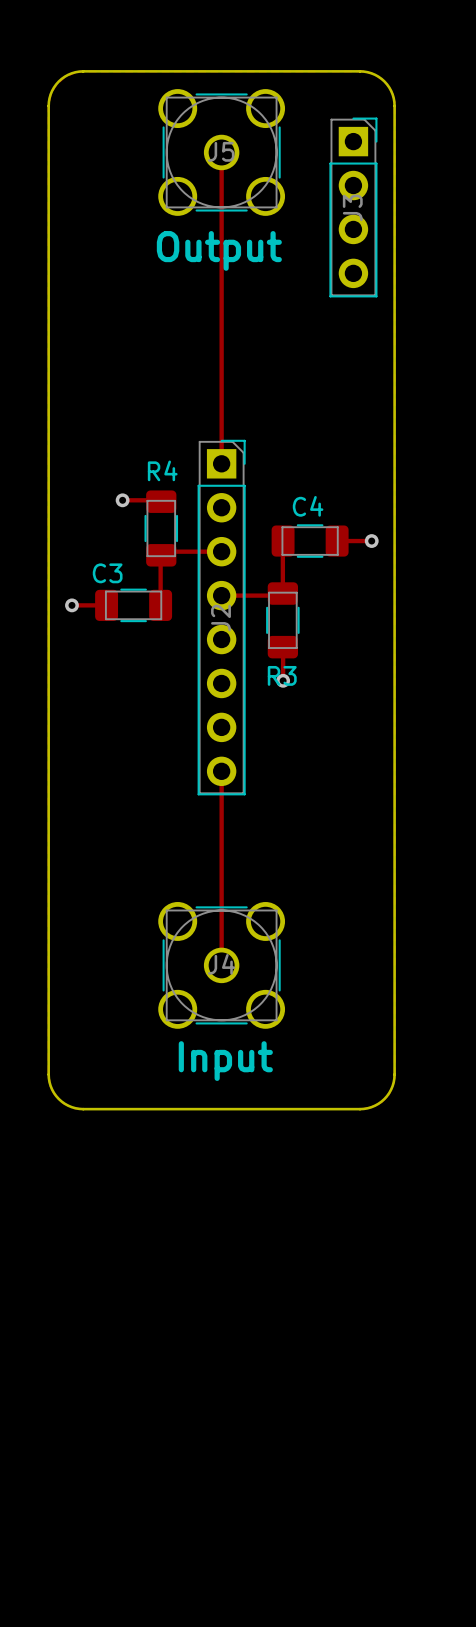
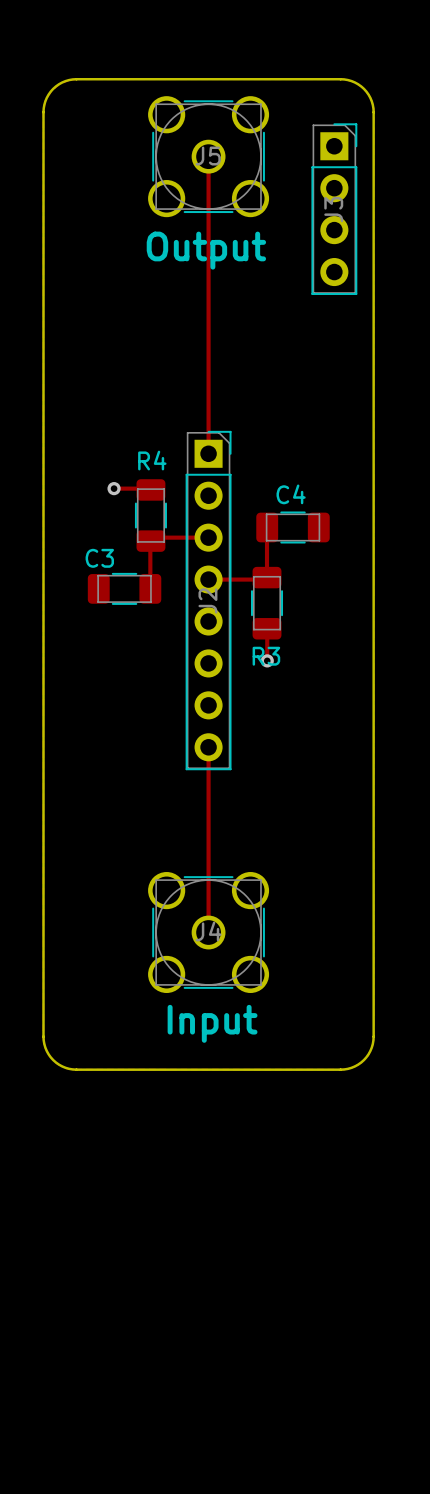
track: (337, 541) (371, 541) -> none
via: (371, 541) -> none
track: (71, 605) (106, 605) -> none
via: (71, 605) -> none

